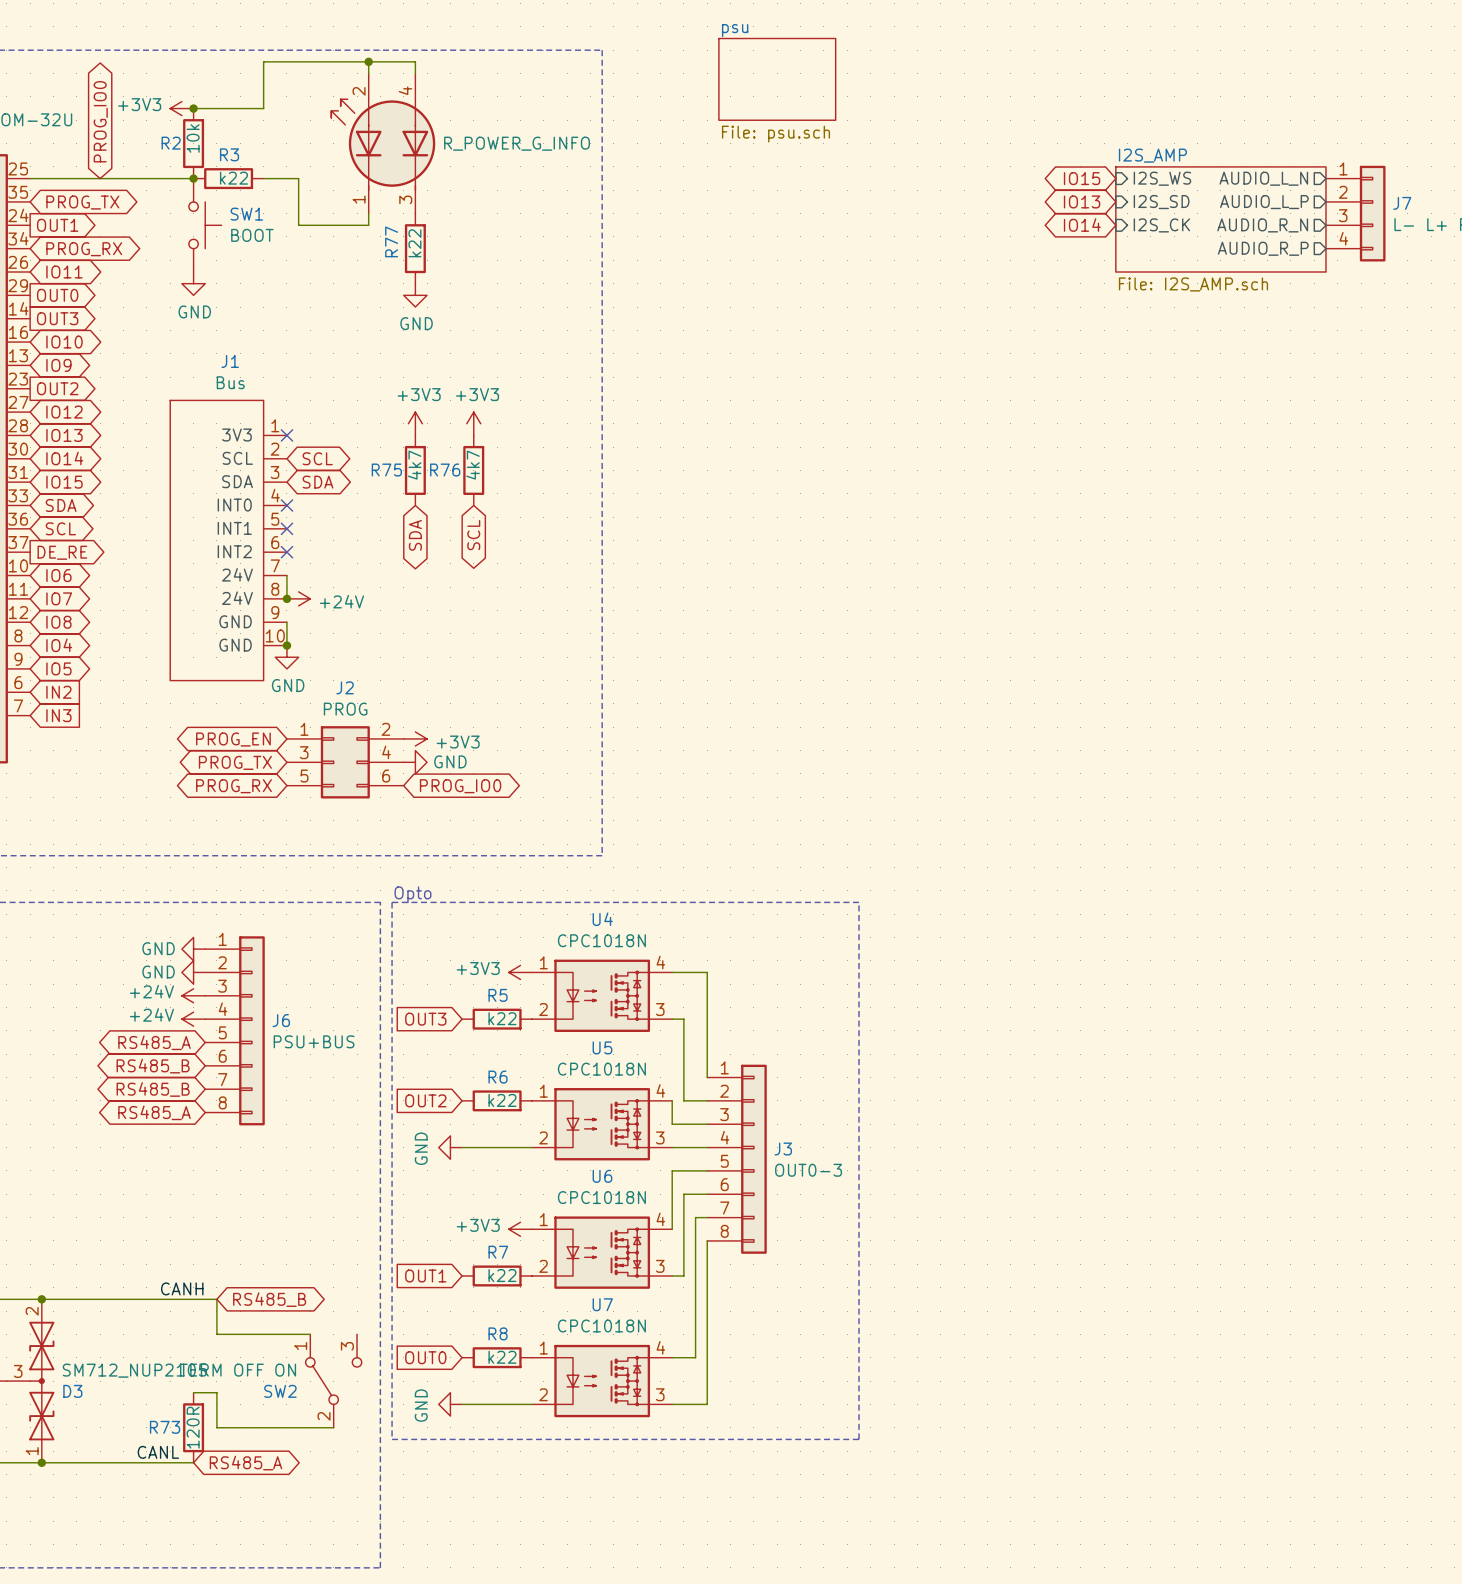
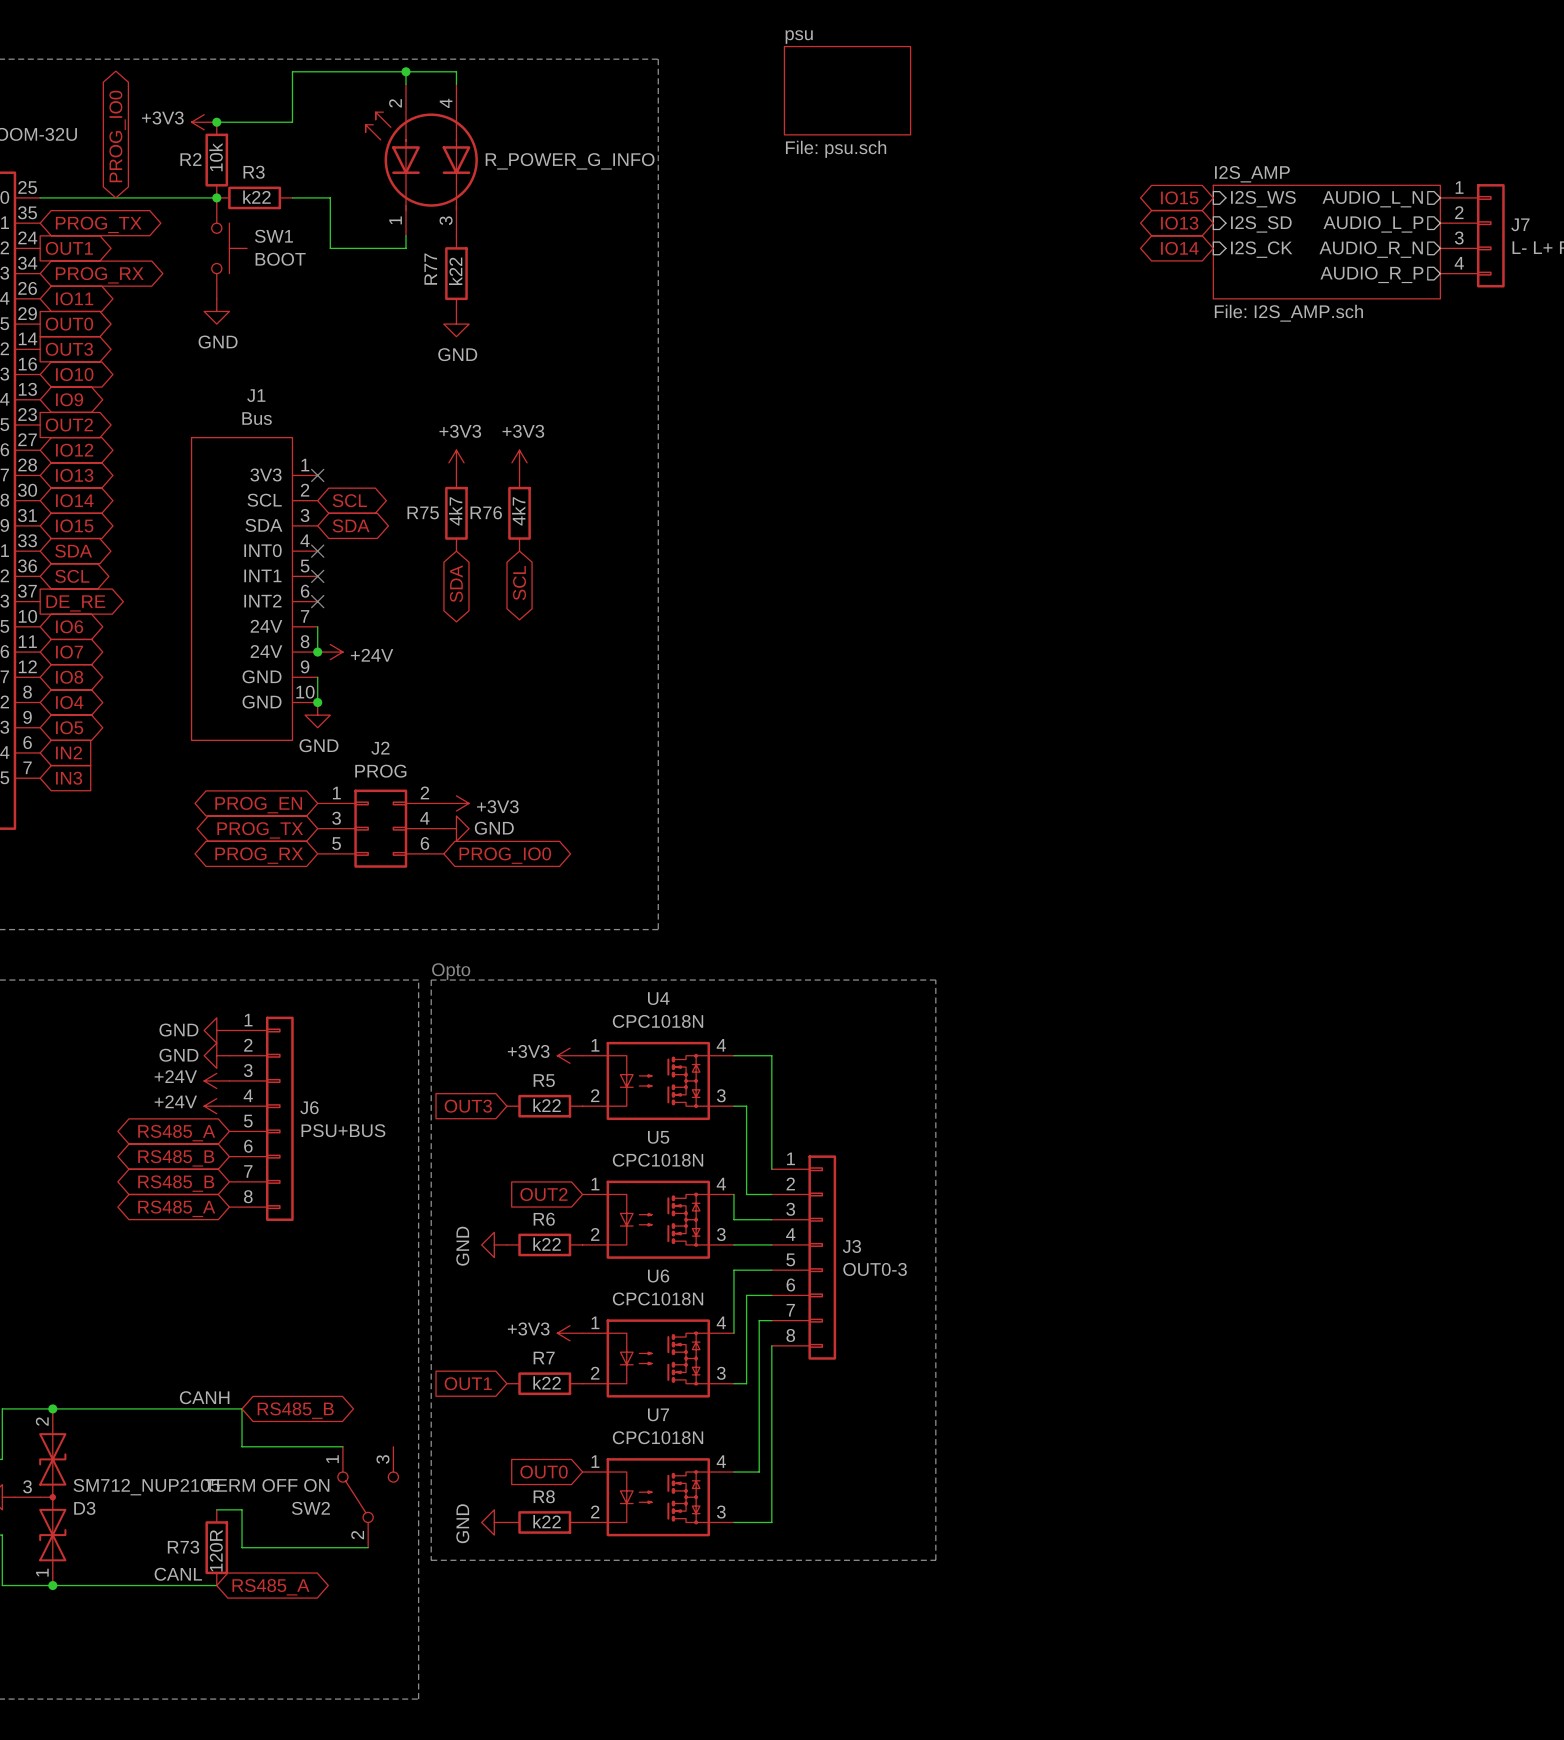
global label position: OUT2 (425, 1100) -> OUT2 (543, 1194)
R6 position: (497, 1100) -> (544, 1244)
wire: (462, 1147) (532, 1147) -> none
global label position: OUT0 (425, 1357) -> OUT0 (544, 1472)
R8 position: (497, 1357) -> (544, 1522)
wire: (462, 1404) (532, 1404) -> none

